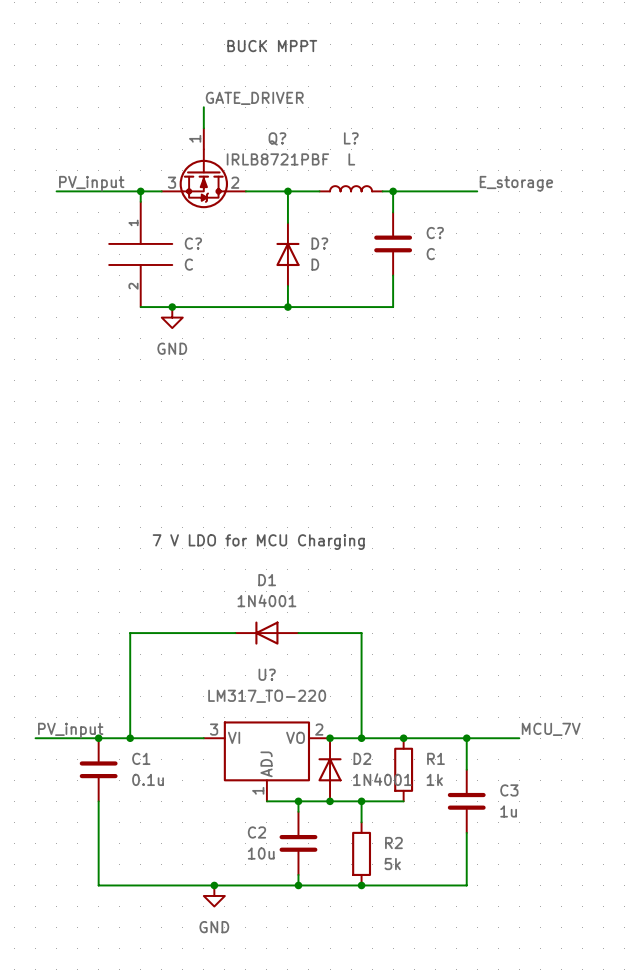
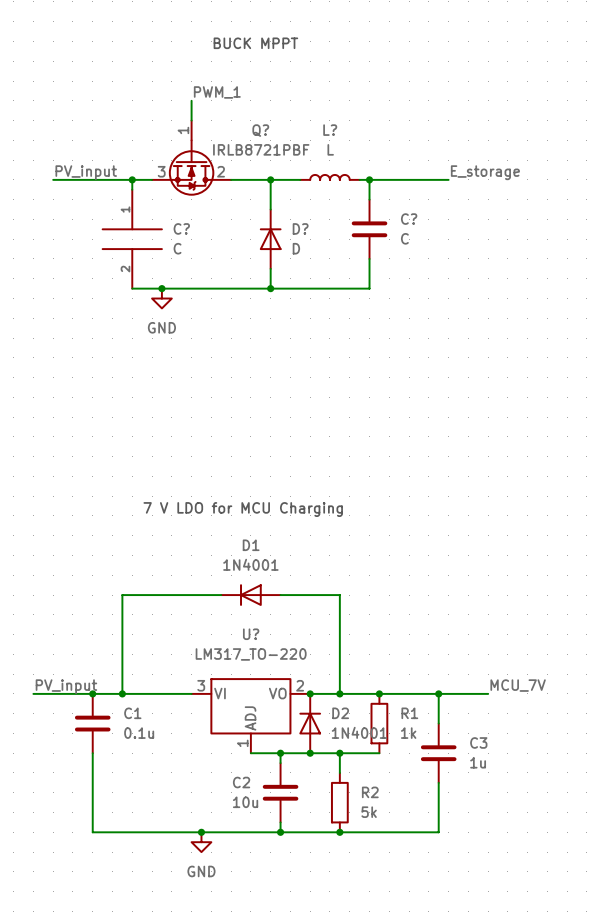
label: GATE_DRIVER (254, 98) -> PWM_1 (217, 92)

